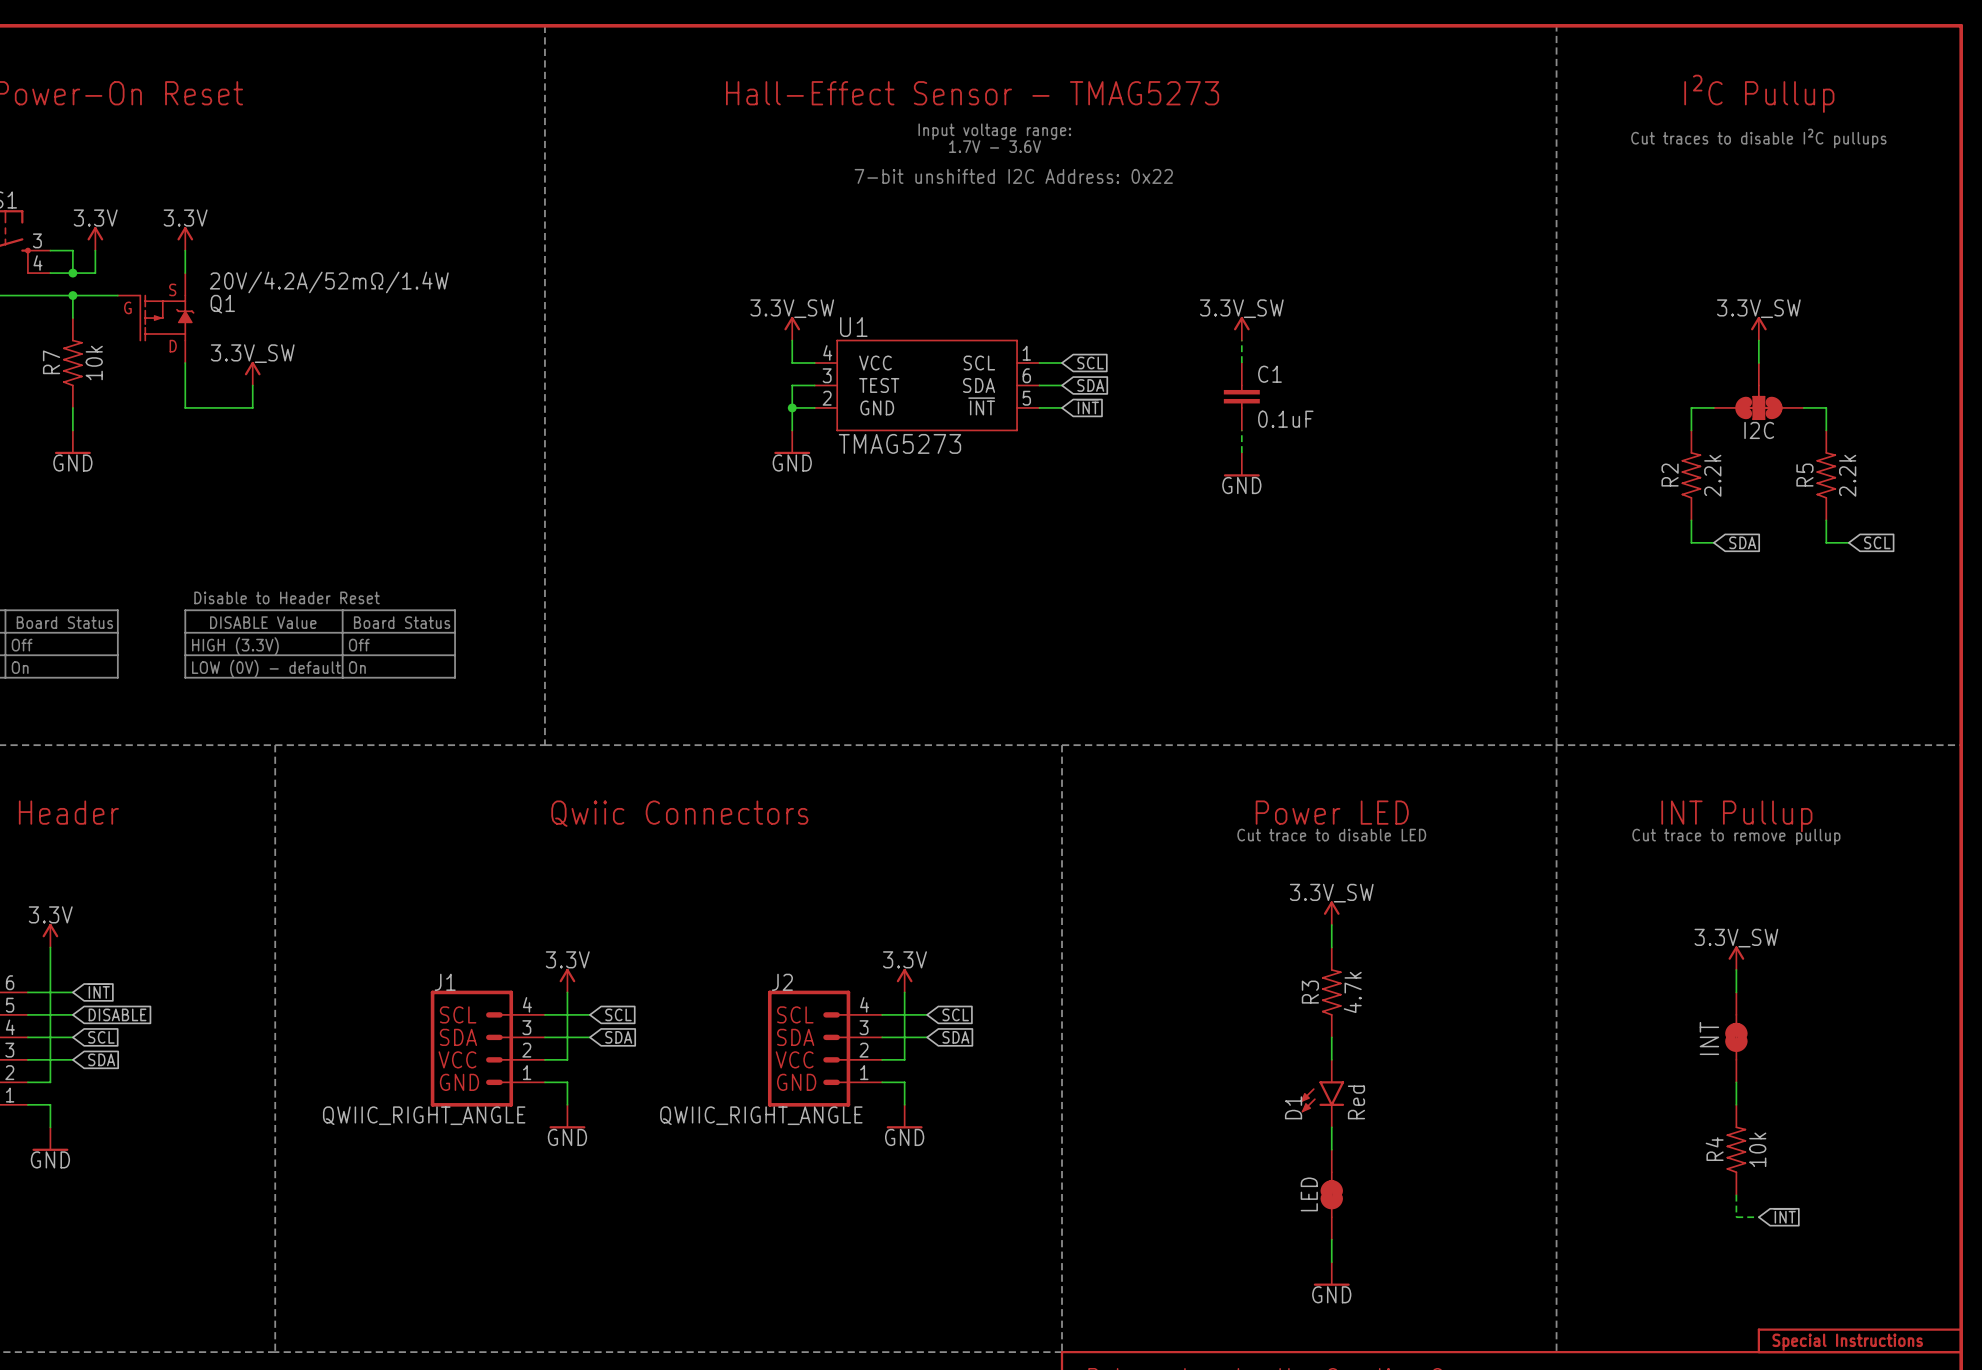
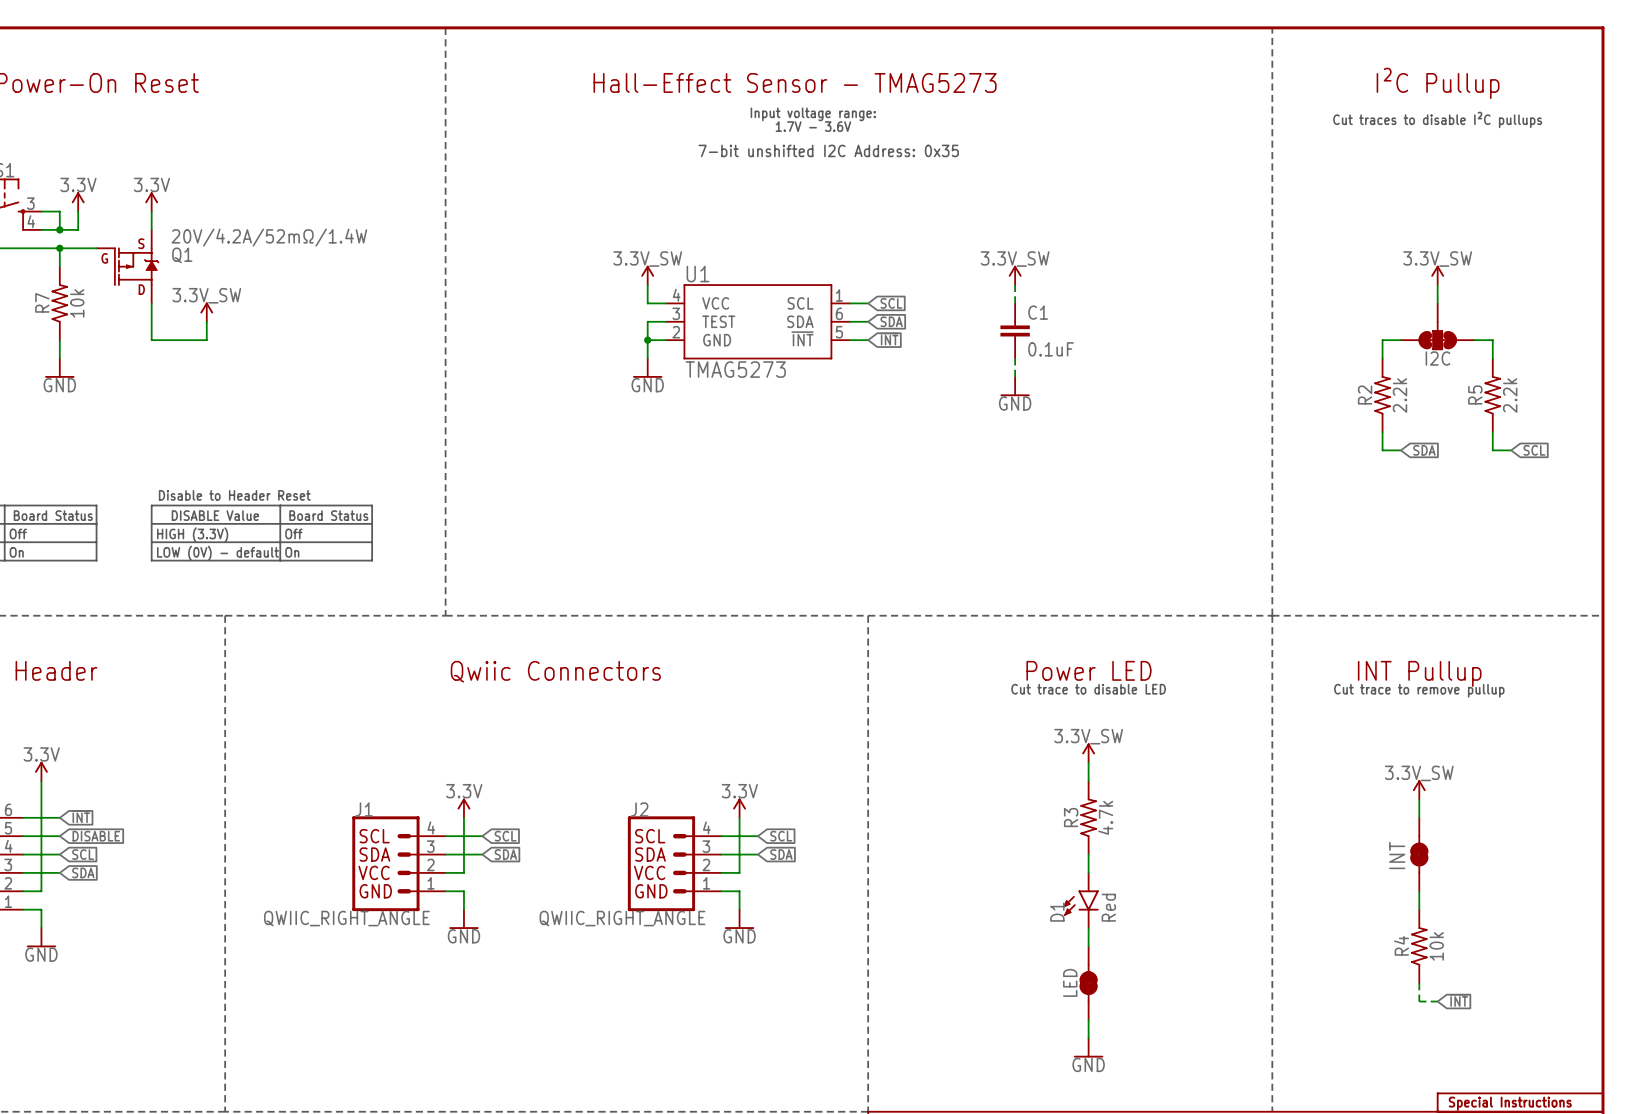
text: 7-bit unshifted I2C Address: 0x22 (1013, 176) -> 7-bit unshifted I2C Address: 0x35 (828, 150)

